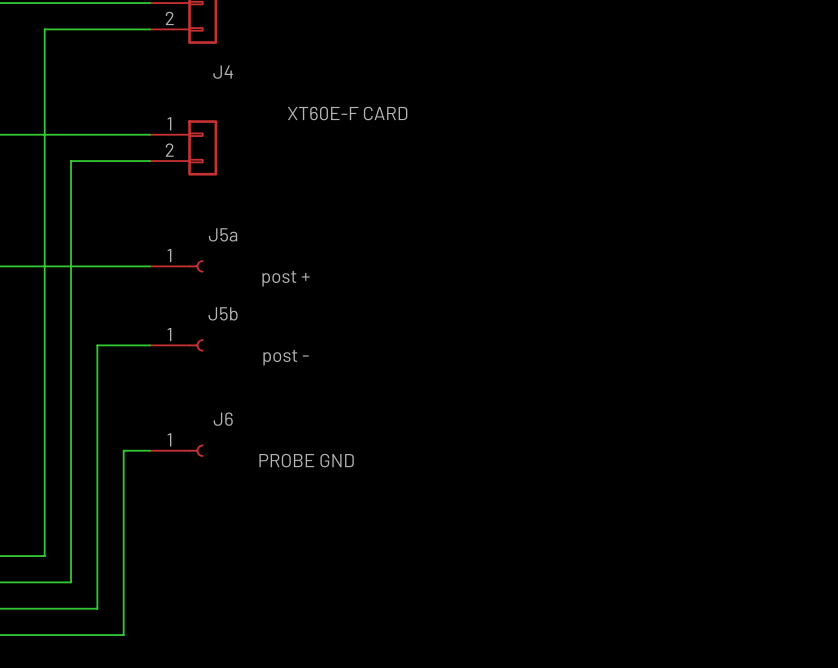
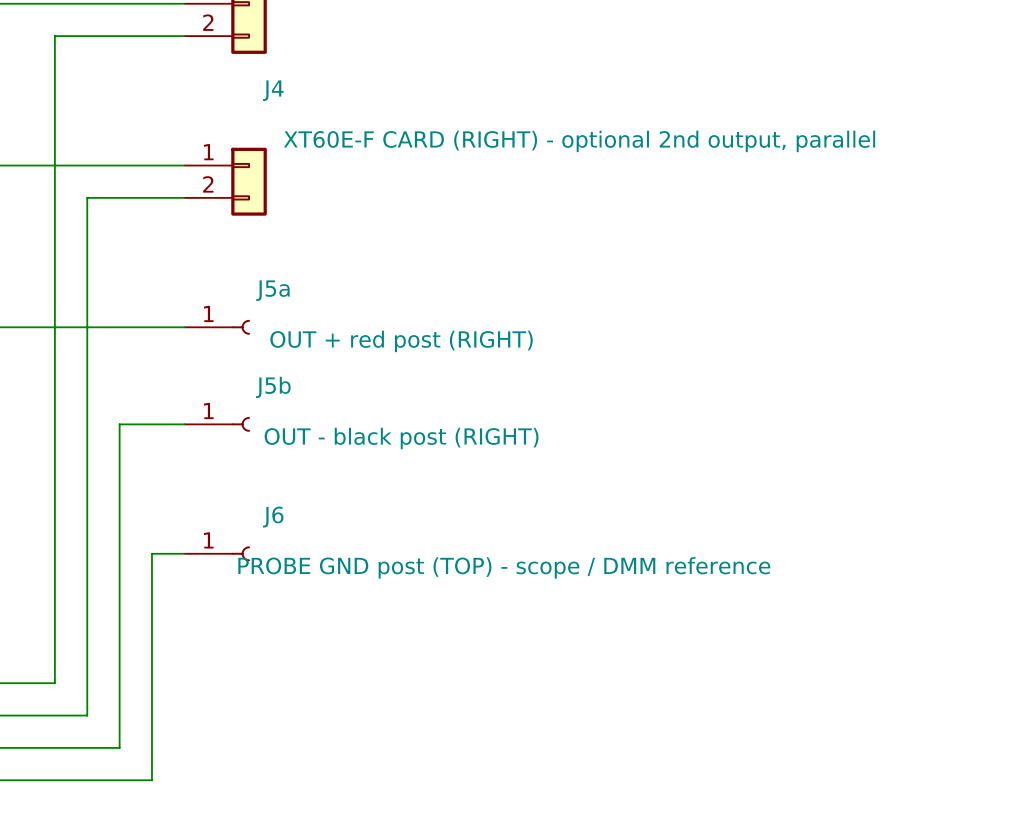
J4 value: XT60E-F CARD (347, 113) -> XT60E-F CARD (RIGHT) - optional 2nd output, parallel (579, 141)
J5a value: post + (286, 278) -> OUT + red post (RIGHT) (401, 341)
J5b value: post - (286, 357) -> OUT - black post (RIGHT) (401, 438)
J6 value: PROBE GND (306, 460) -> PROBE GND post (TOP) - scope / DMM reference (504, 567)

